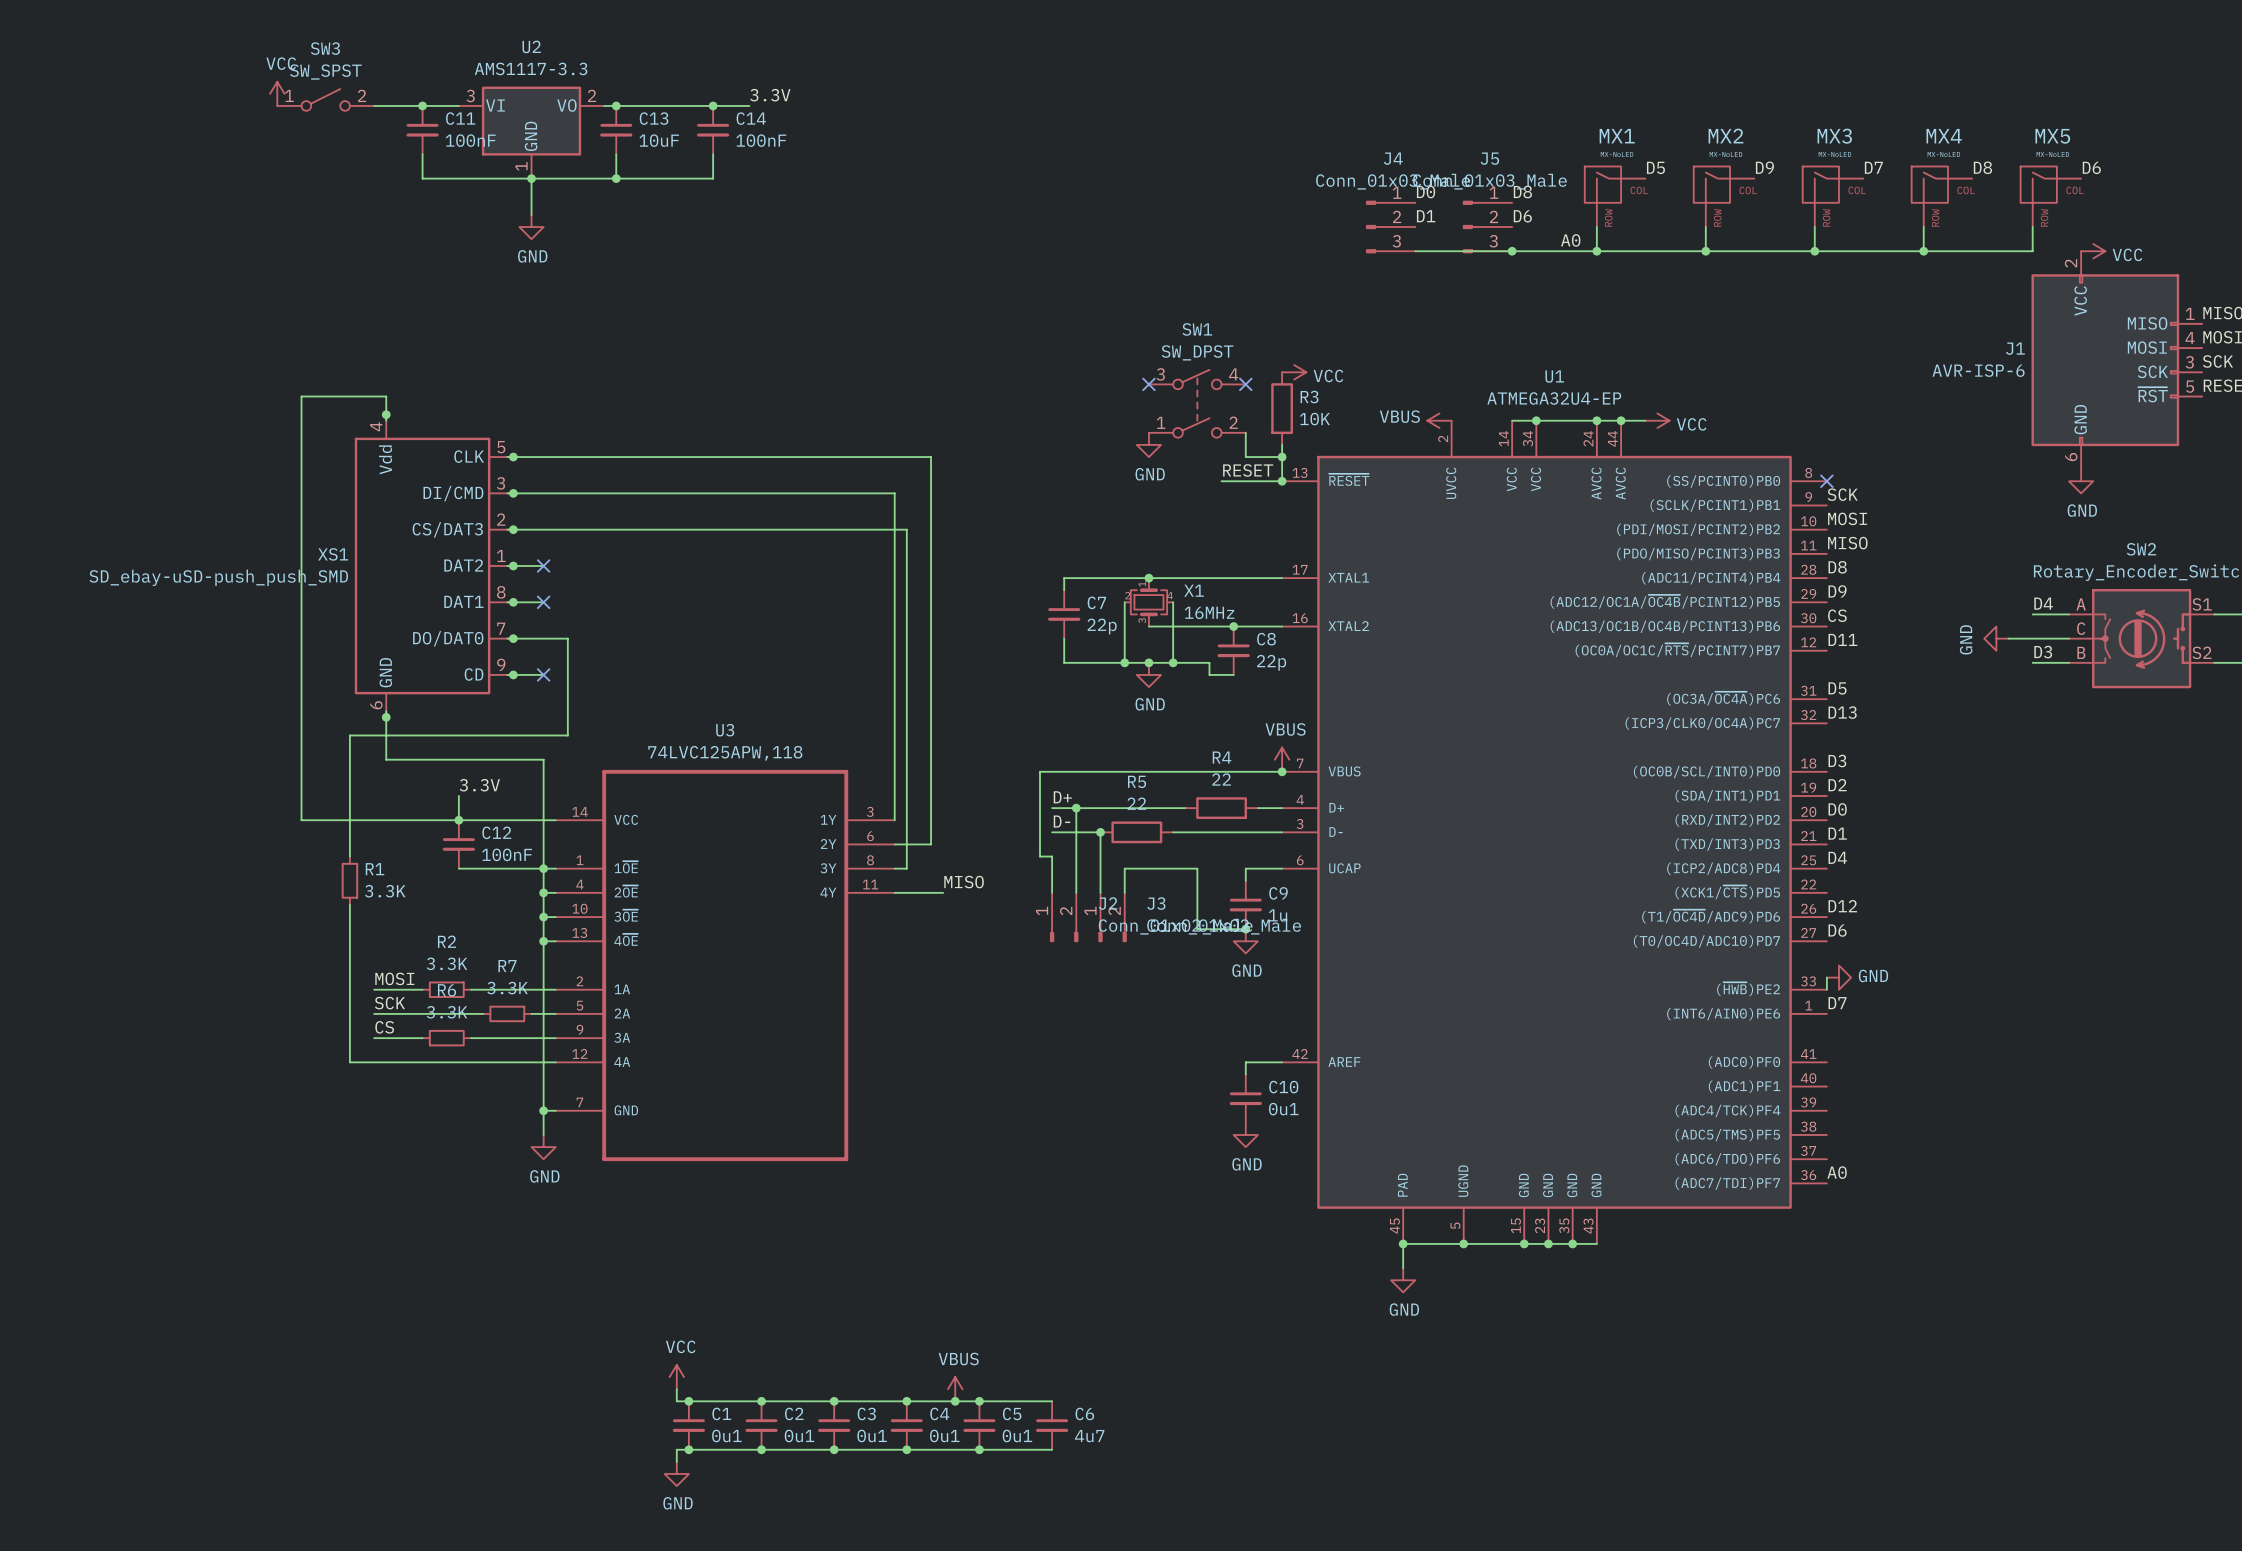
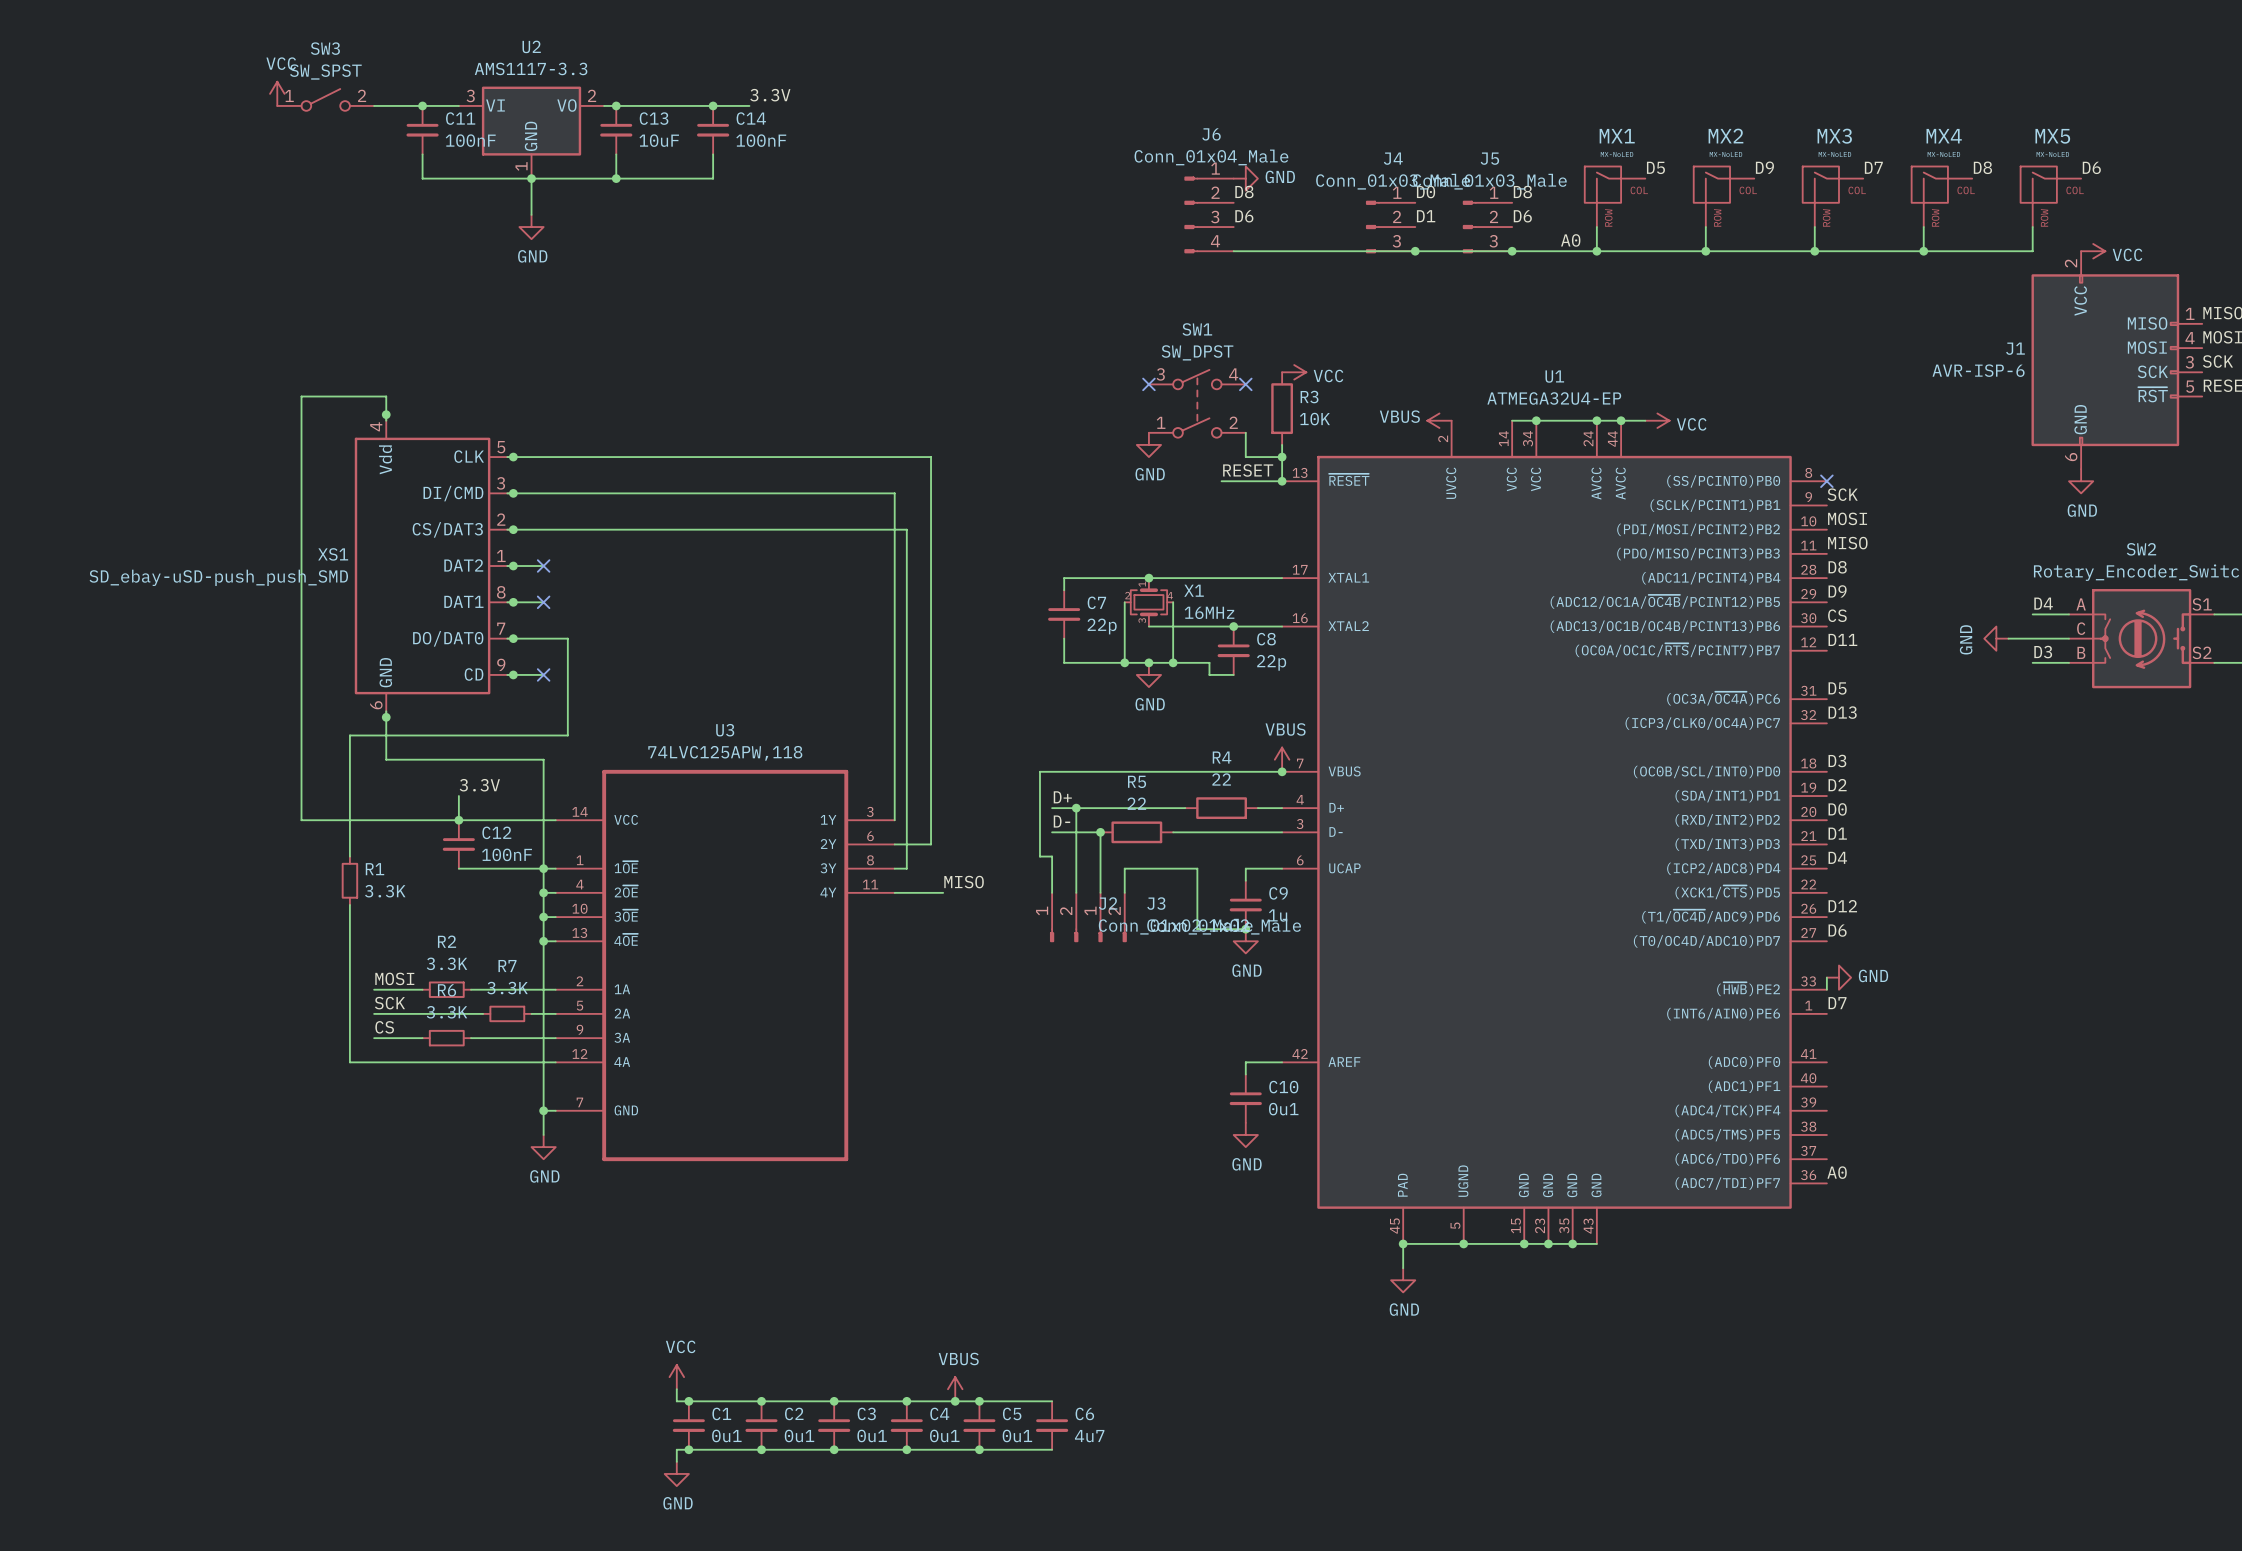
power symbol: none -> GND (1245, 178)
label: none -> D8 (1244, 192)
J6: none -> Conn_01x04_Male (1209, 214)
label: none -> D6 (1244, 216)
wire: none -> (1233, 251) (1415, 251)
junction: none -> (1415, 251)

